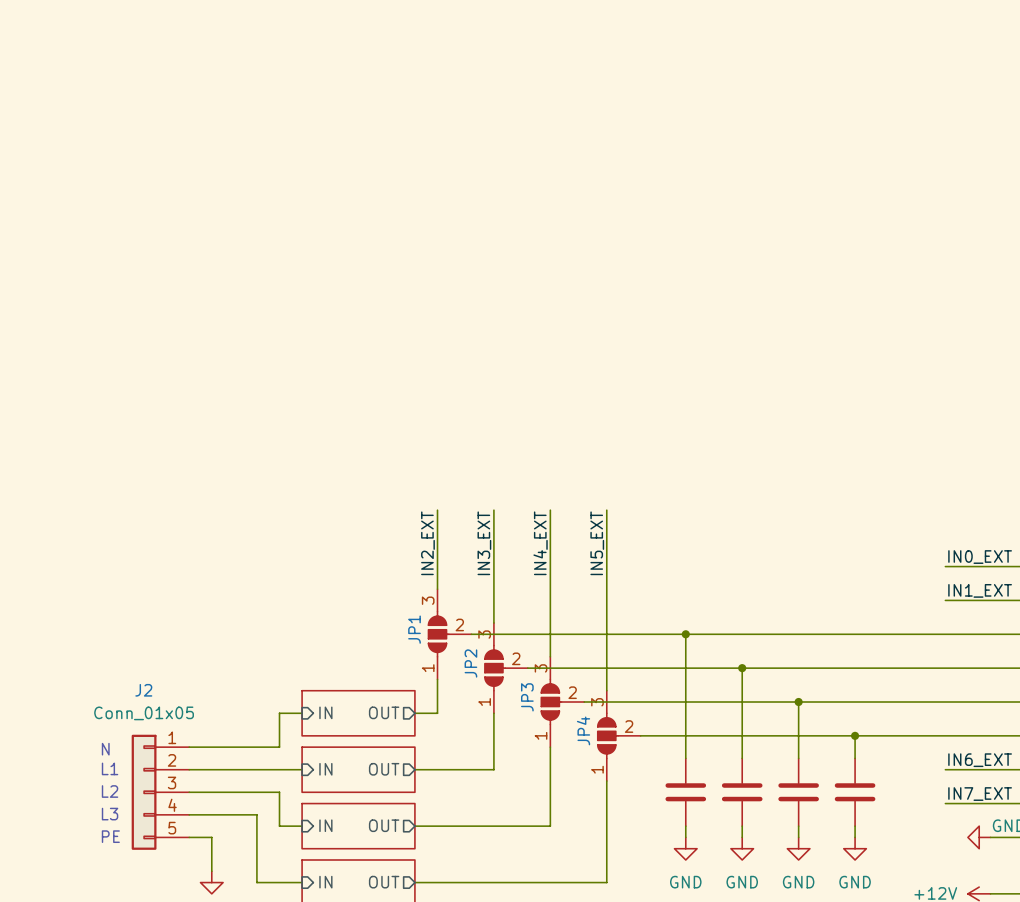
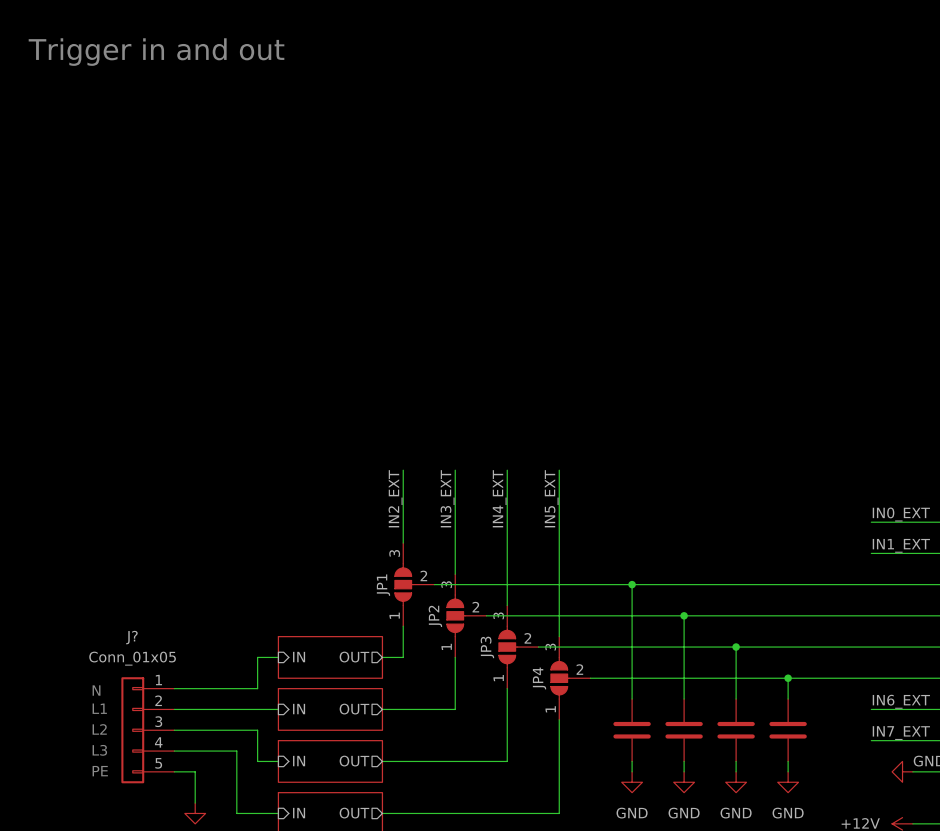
text: none -> Trigger in and out (156, 52)
J2 name: J2 (143, 690) -> J? (131, 637)

